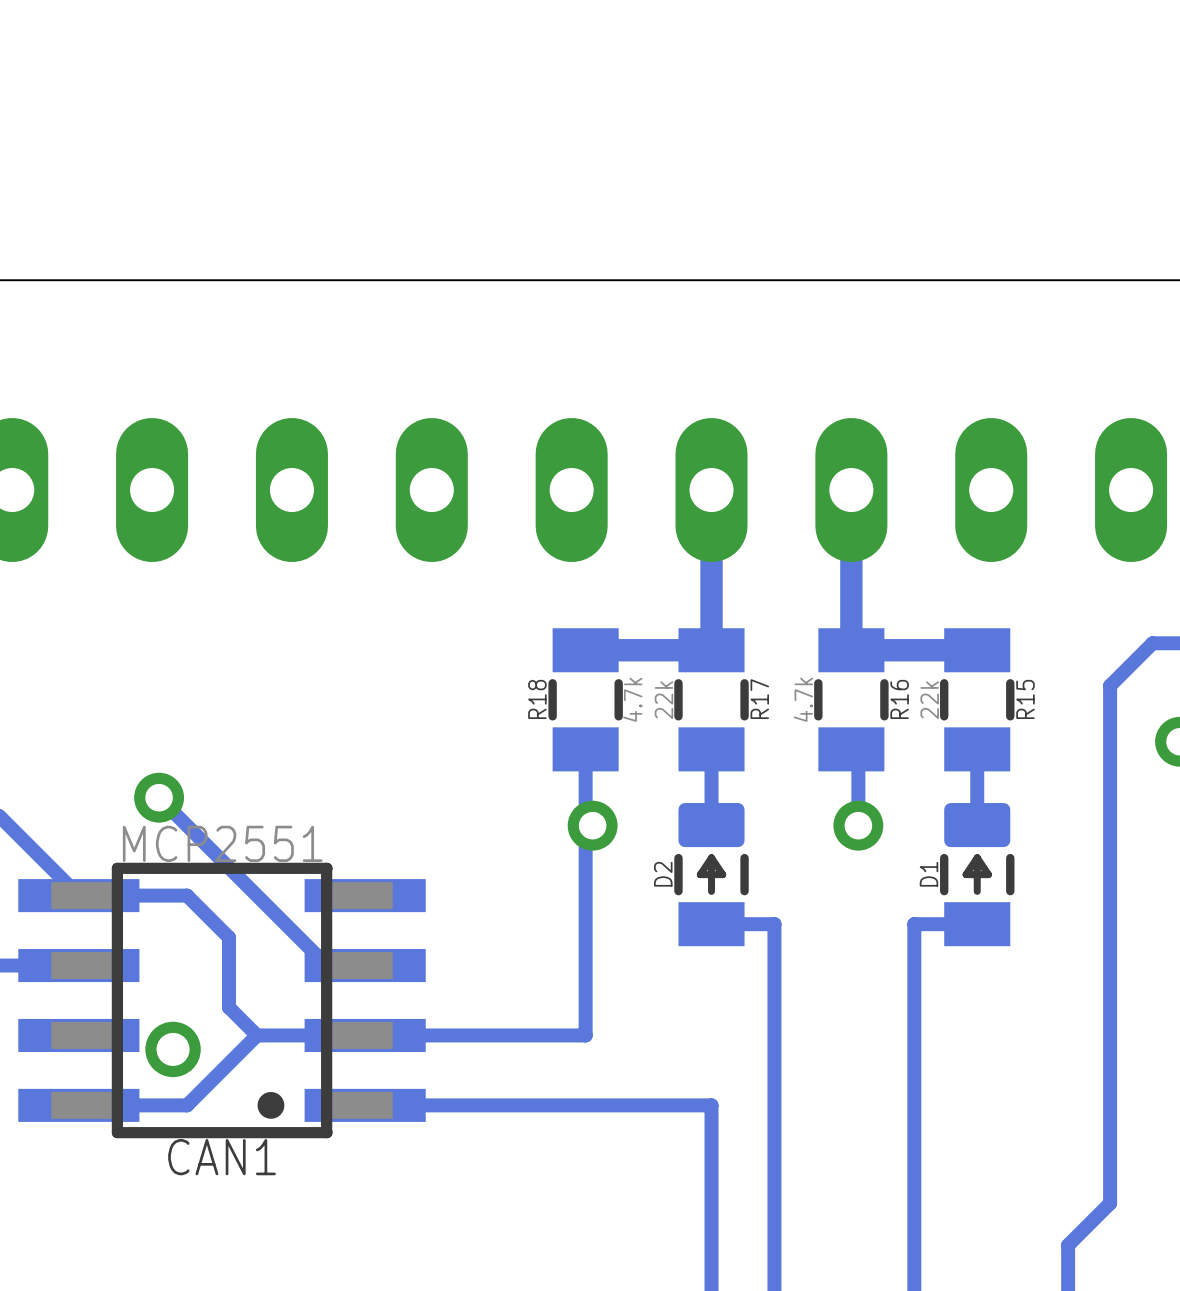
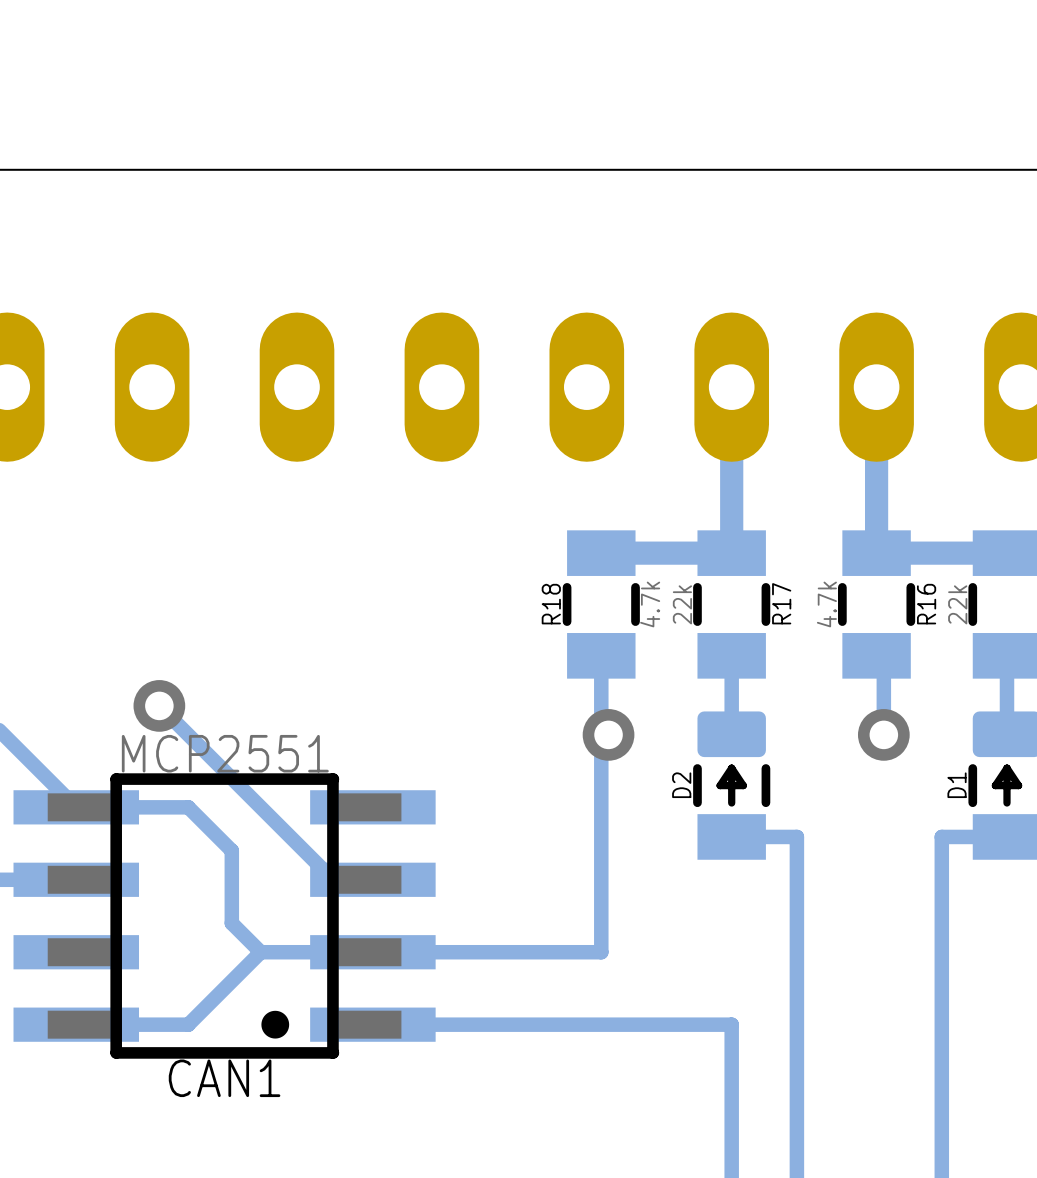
via: (173, 1049) -> none

